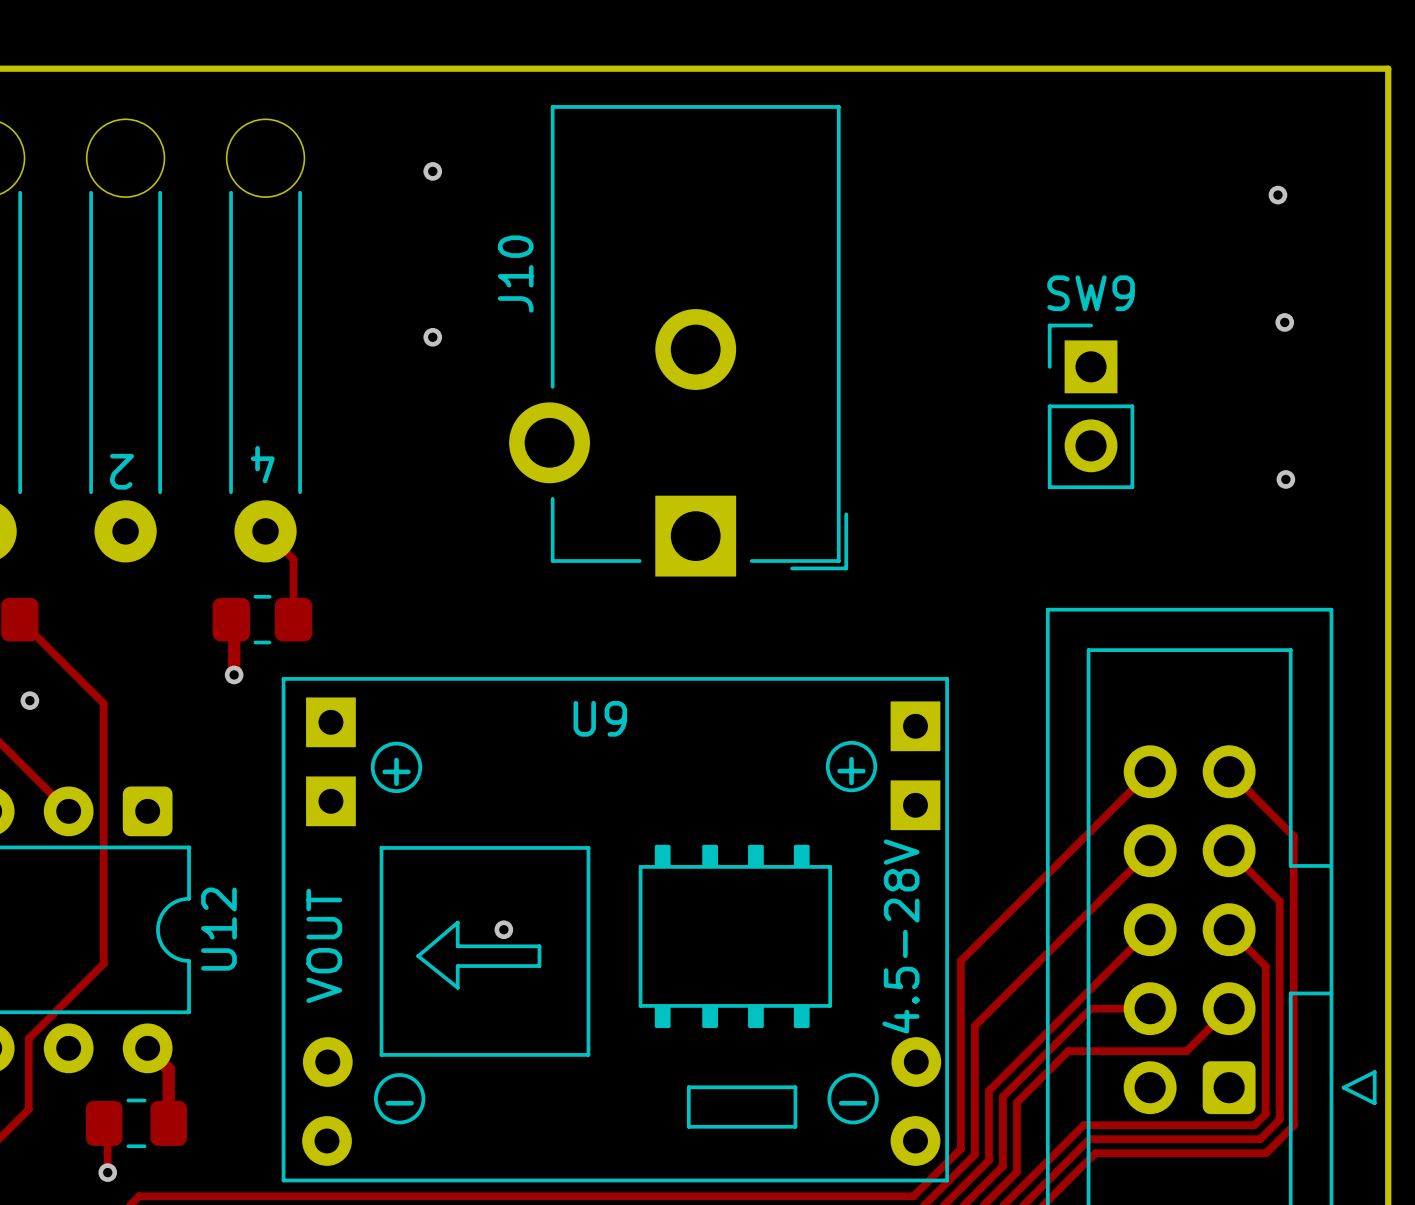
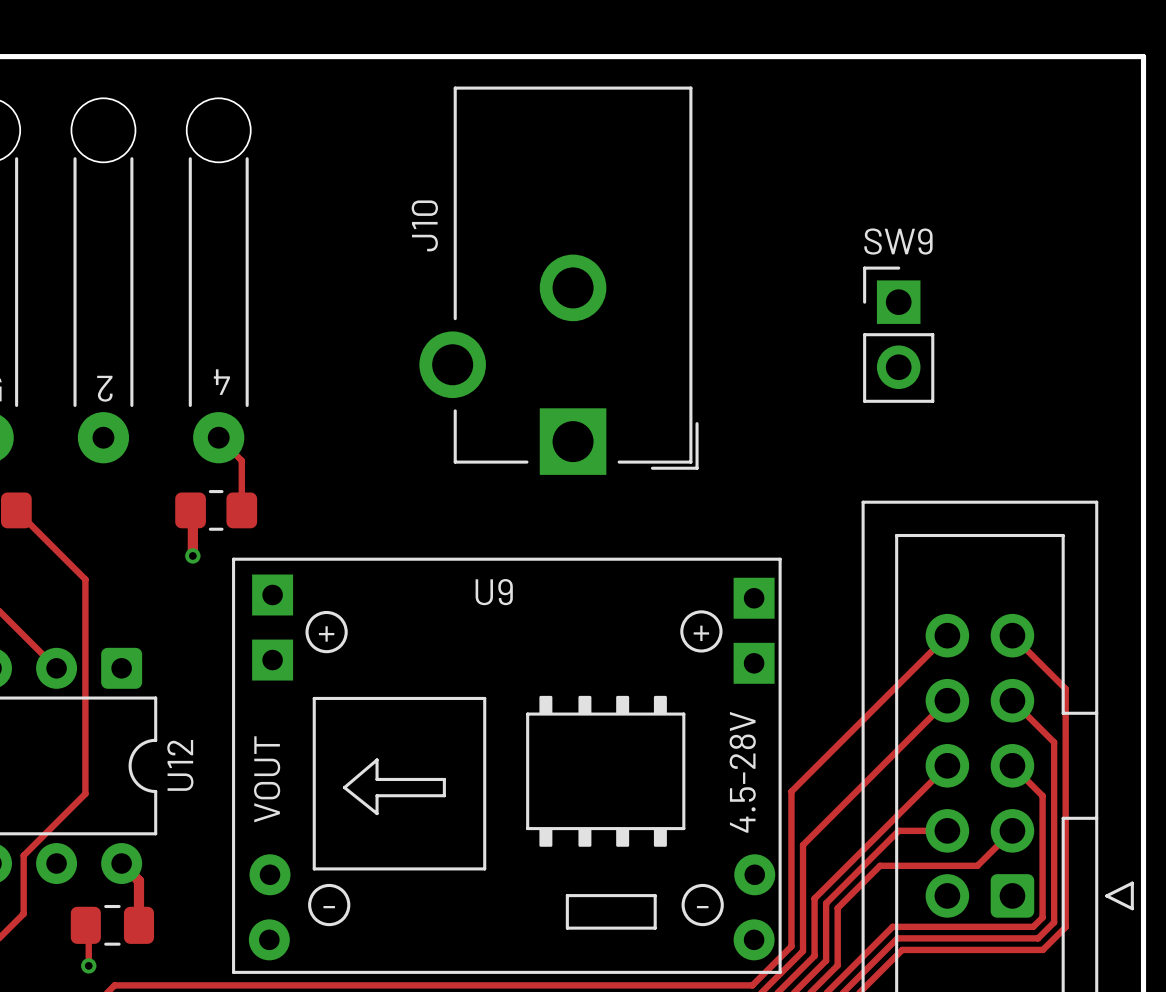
via: (432, 171) -> none
via: (1277, 195) -> none
via: (1284, 322) -> none
via: (432, 337) -> none
via: (1285, 479) -> none
via: (29, 700) -> none
via: (503, 929) -> none

